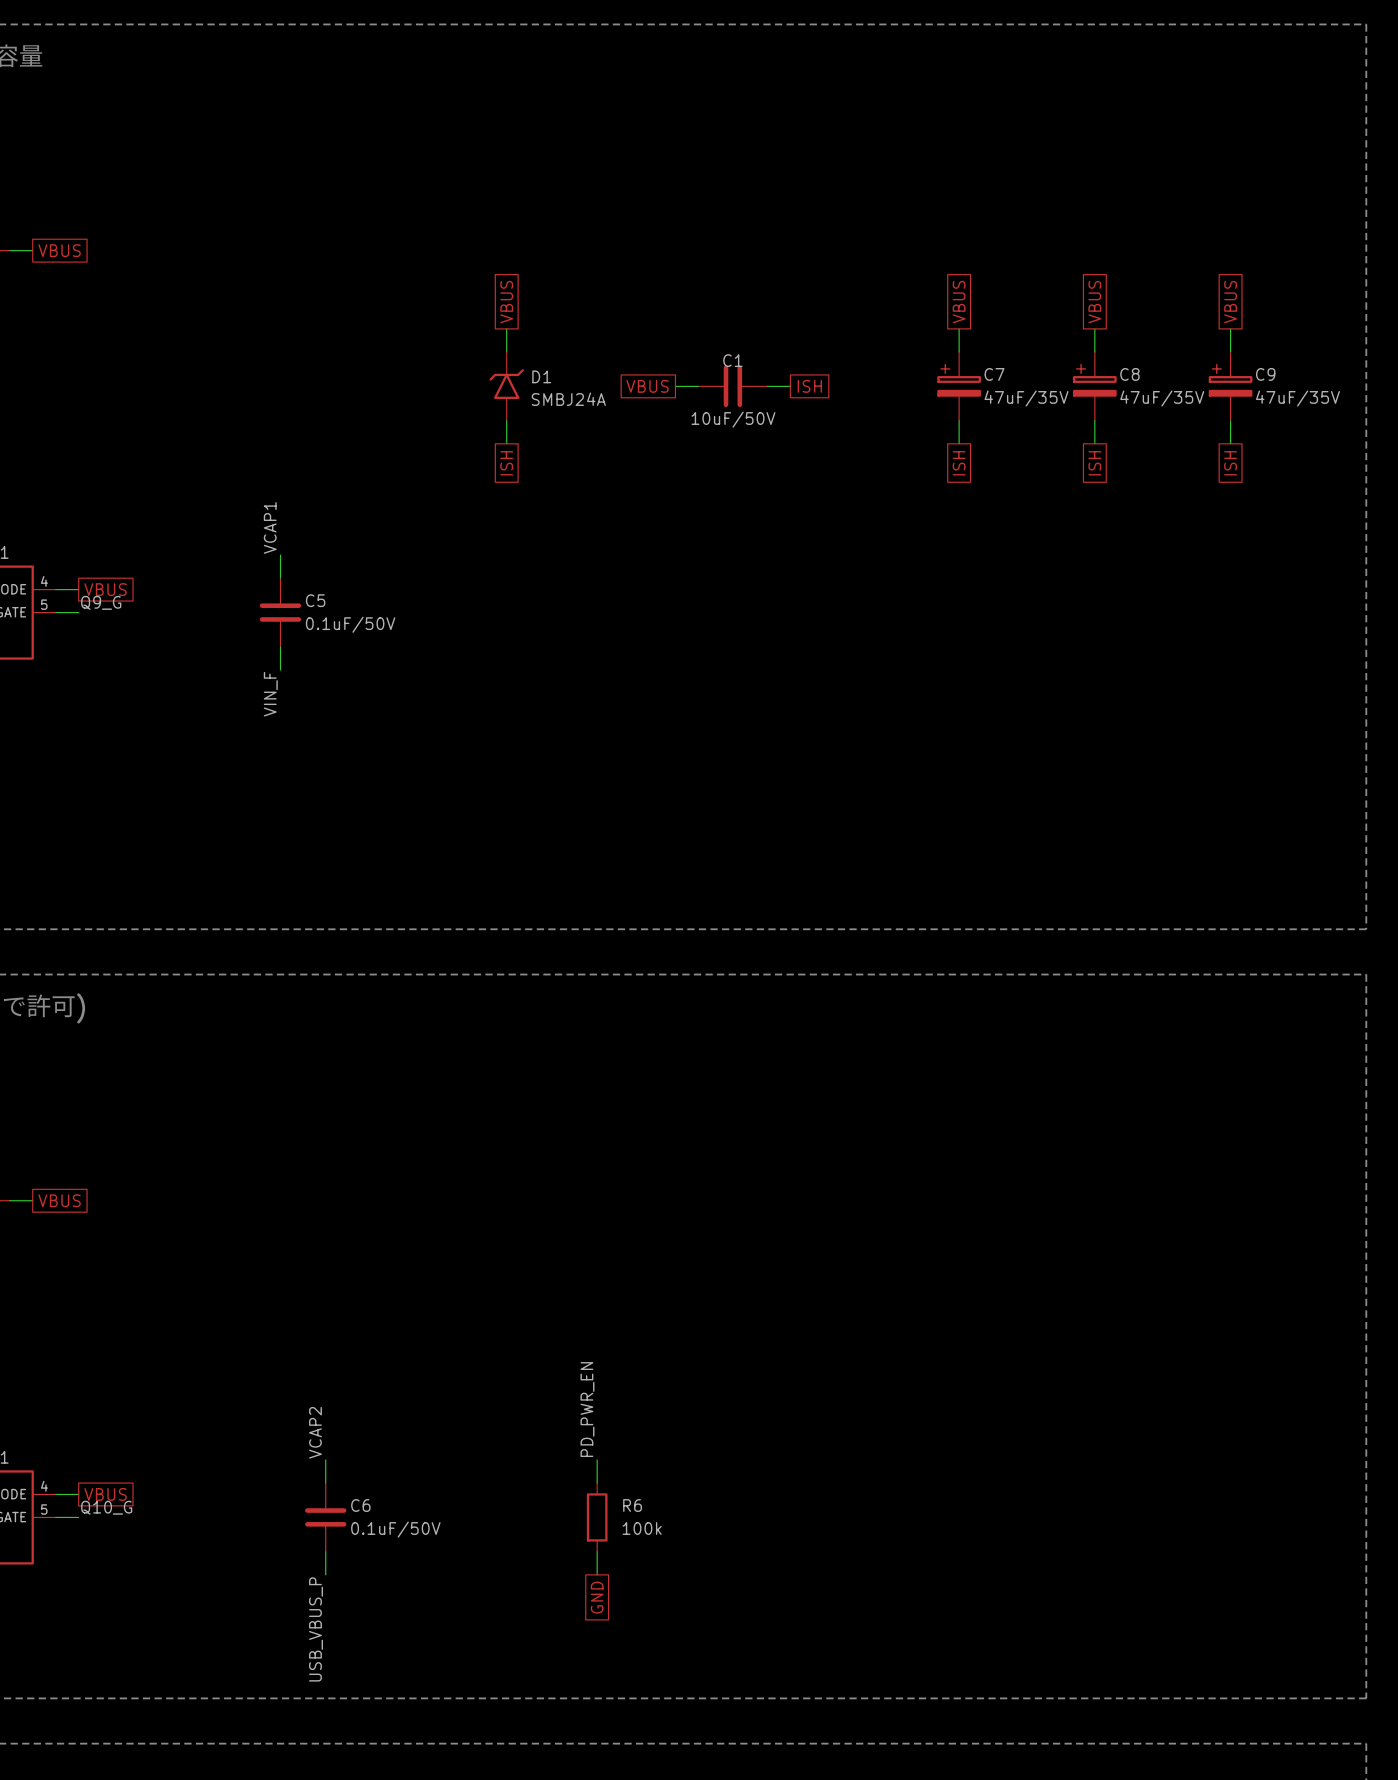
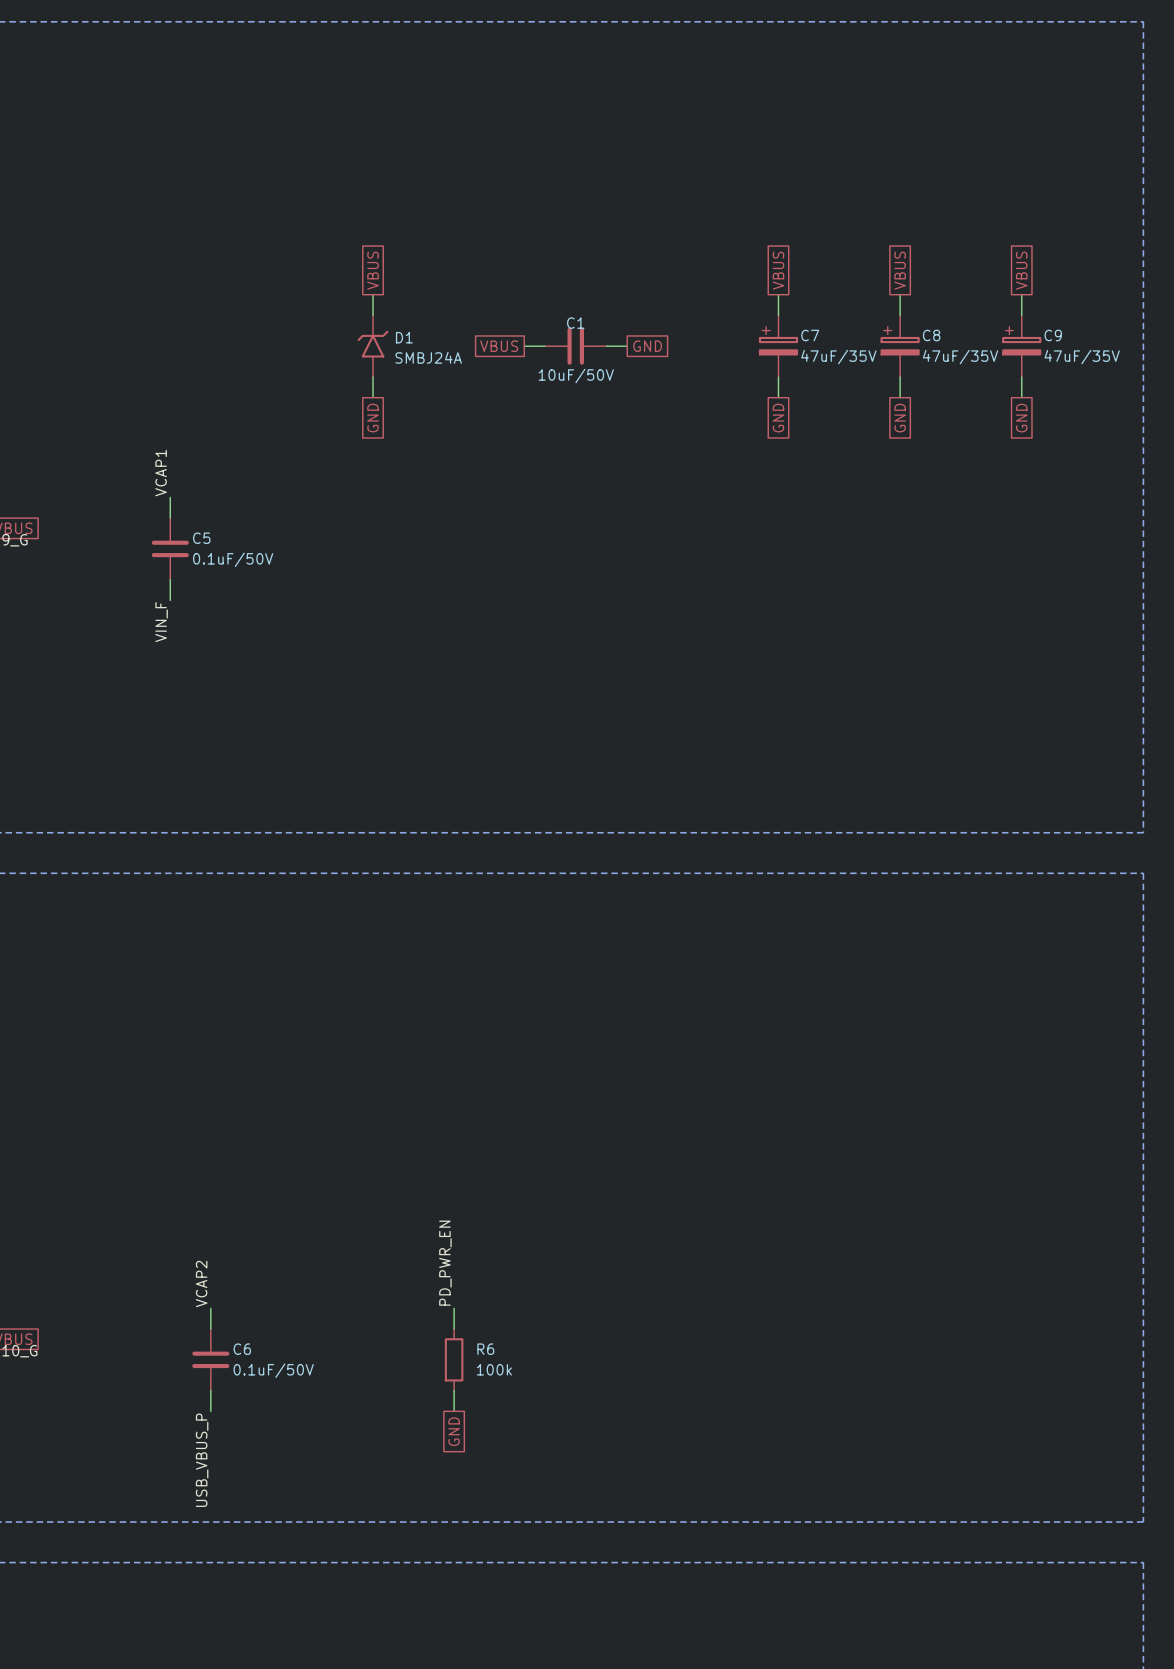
global label: ISH (809, 386) -> GND (647, 346)
global label: ISH (506, 463) -> GND (373, 418)
global label: ISH (959, 463) -> GND (778, 418)
global label: ISH (1094, 463) -> GND (900, 418)
global label: ISH (1230, 463) -> GND (1021, 418)

